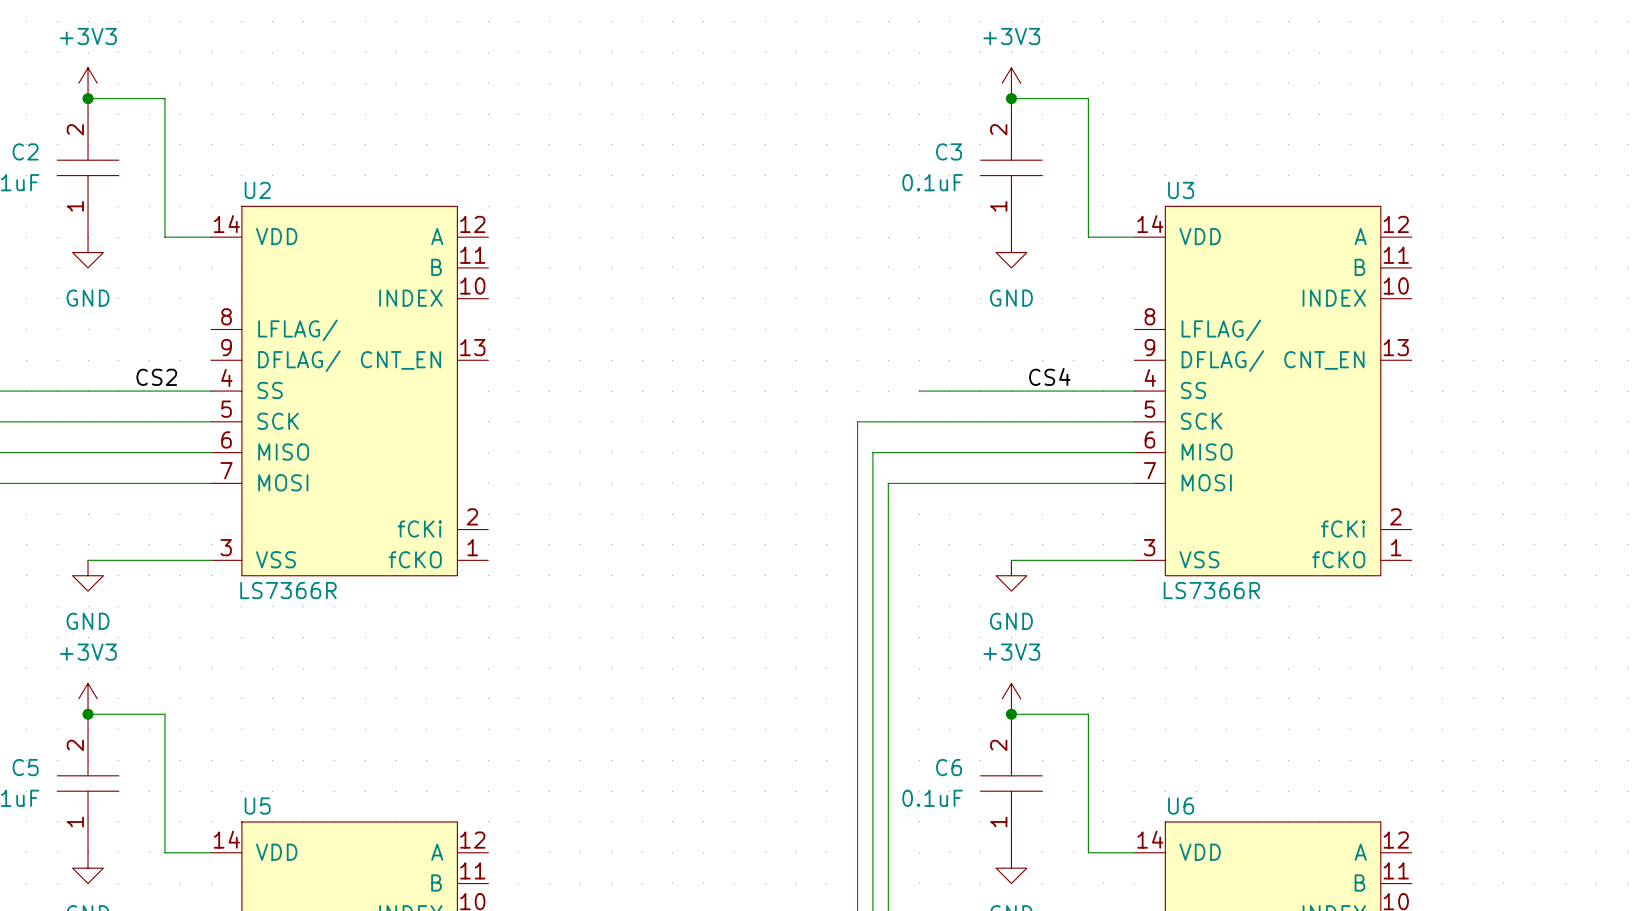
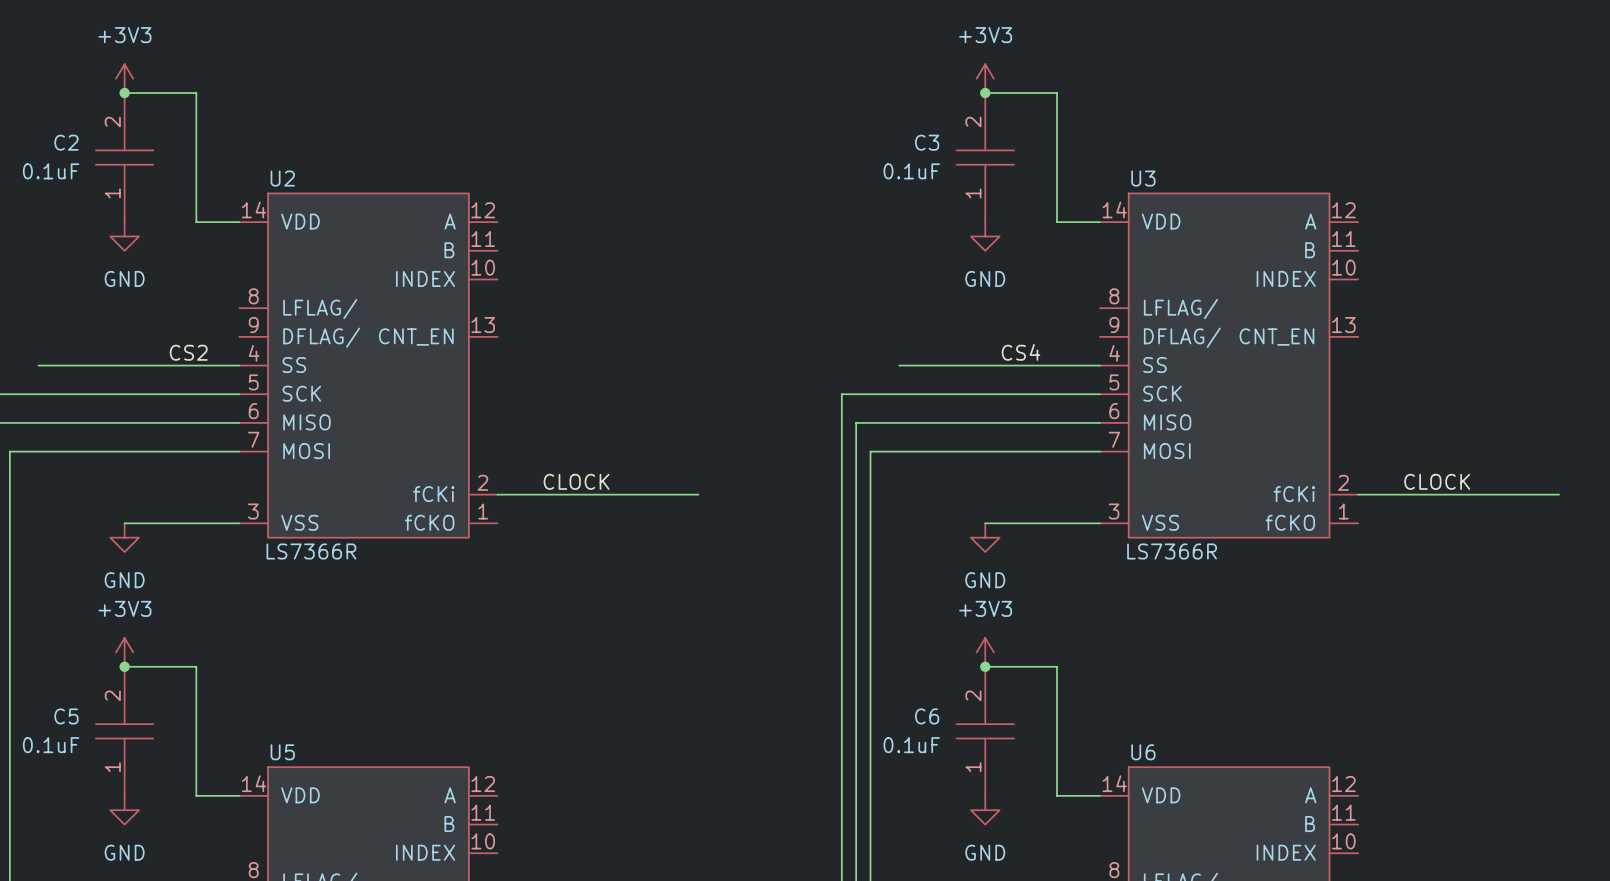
label: none -> CLOCK (576, 481)
label: none -> CLOCK (1437, 481)
wire: none -> (497, 494) (698, 494)
wire: none -> (1358, 494) (1559, 494)

